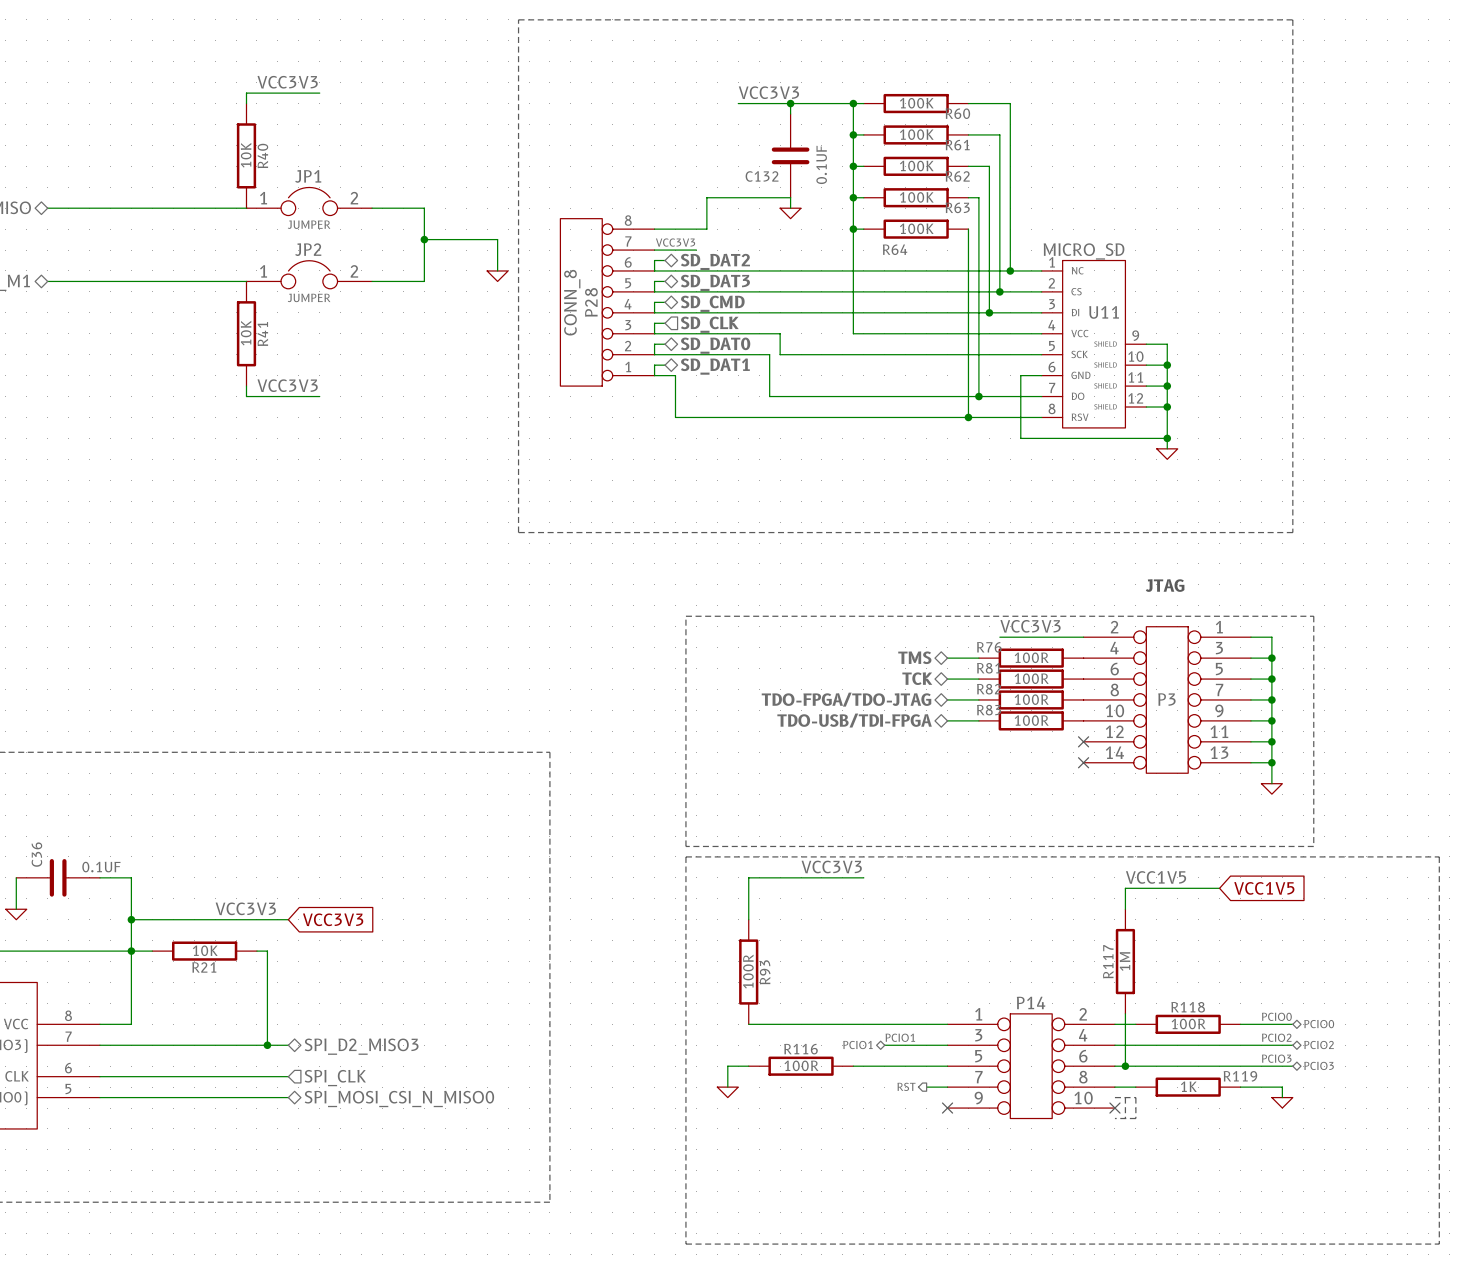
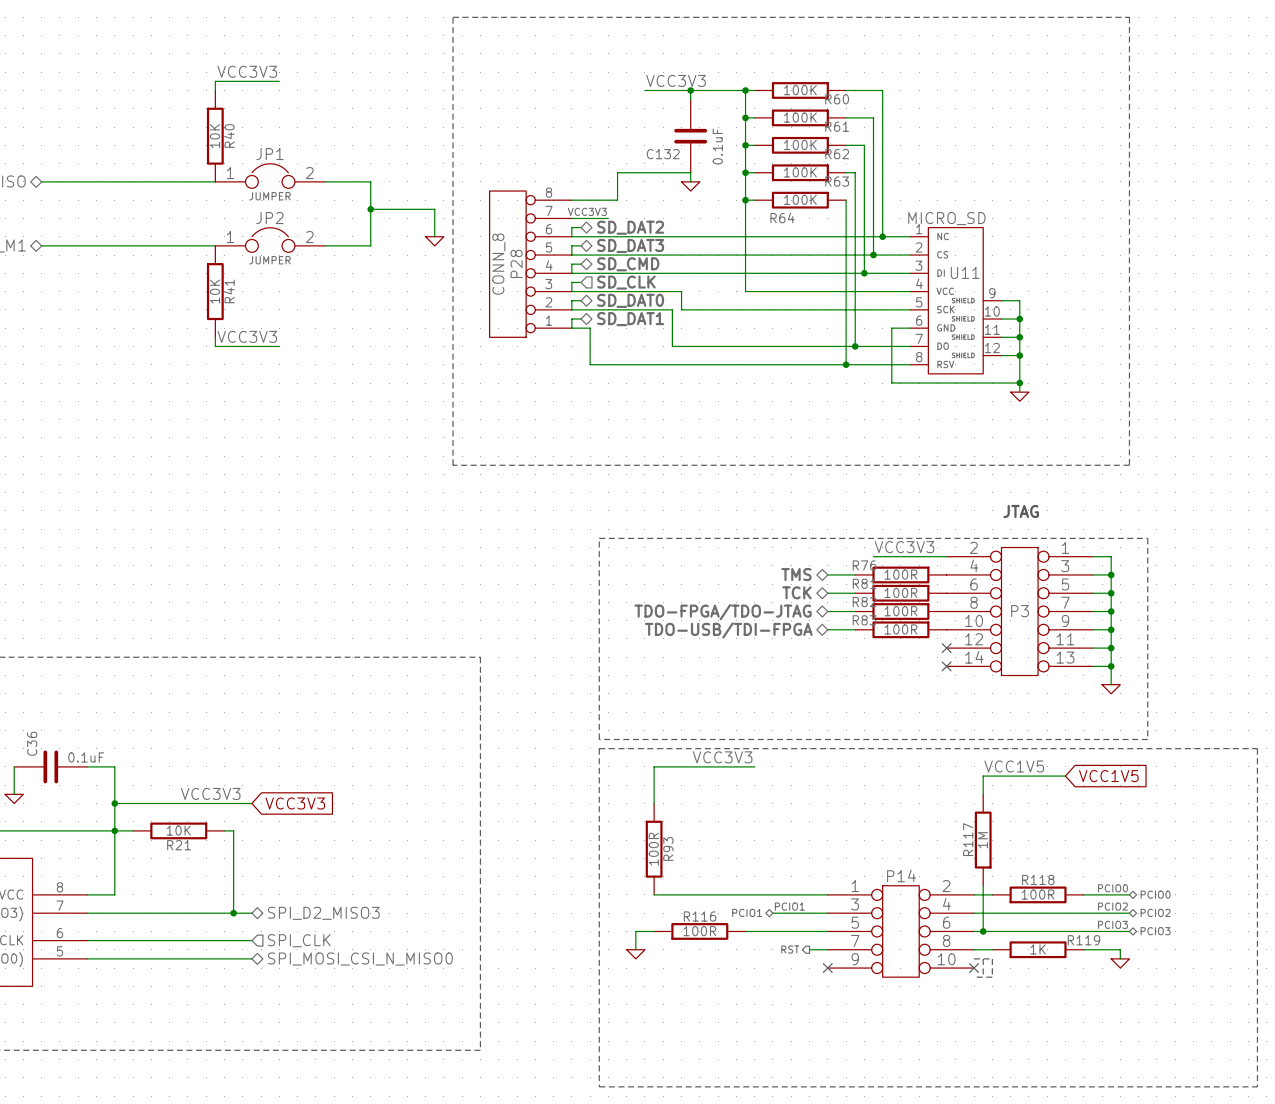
C132 value: 0.1UF (821, 164) -> 0.1uF (717, 146)
C36 value: 0.1UF (101, 867) -> 0.1uF (86, 757)

